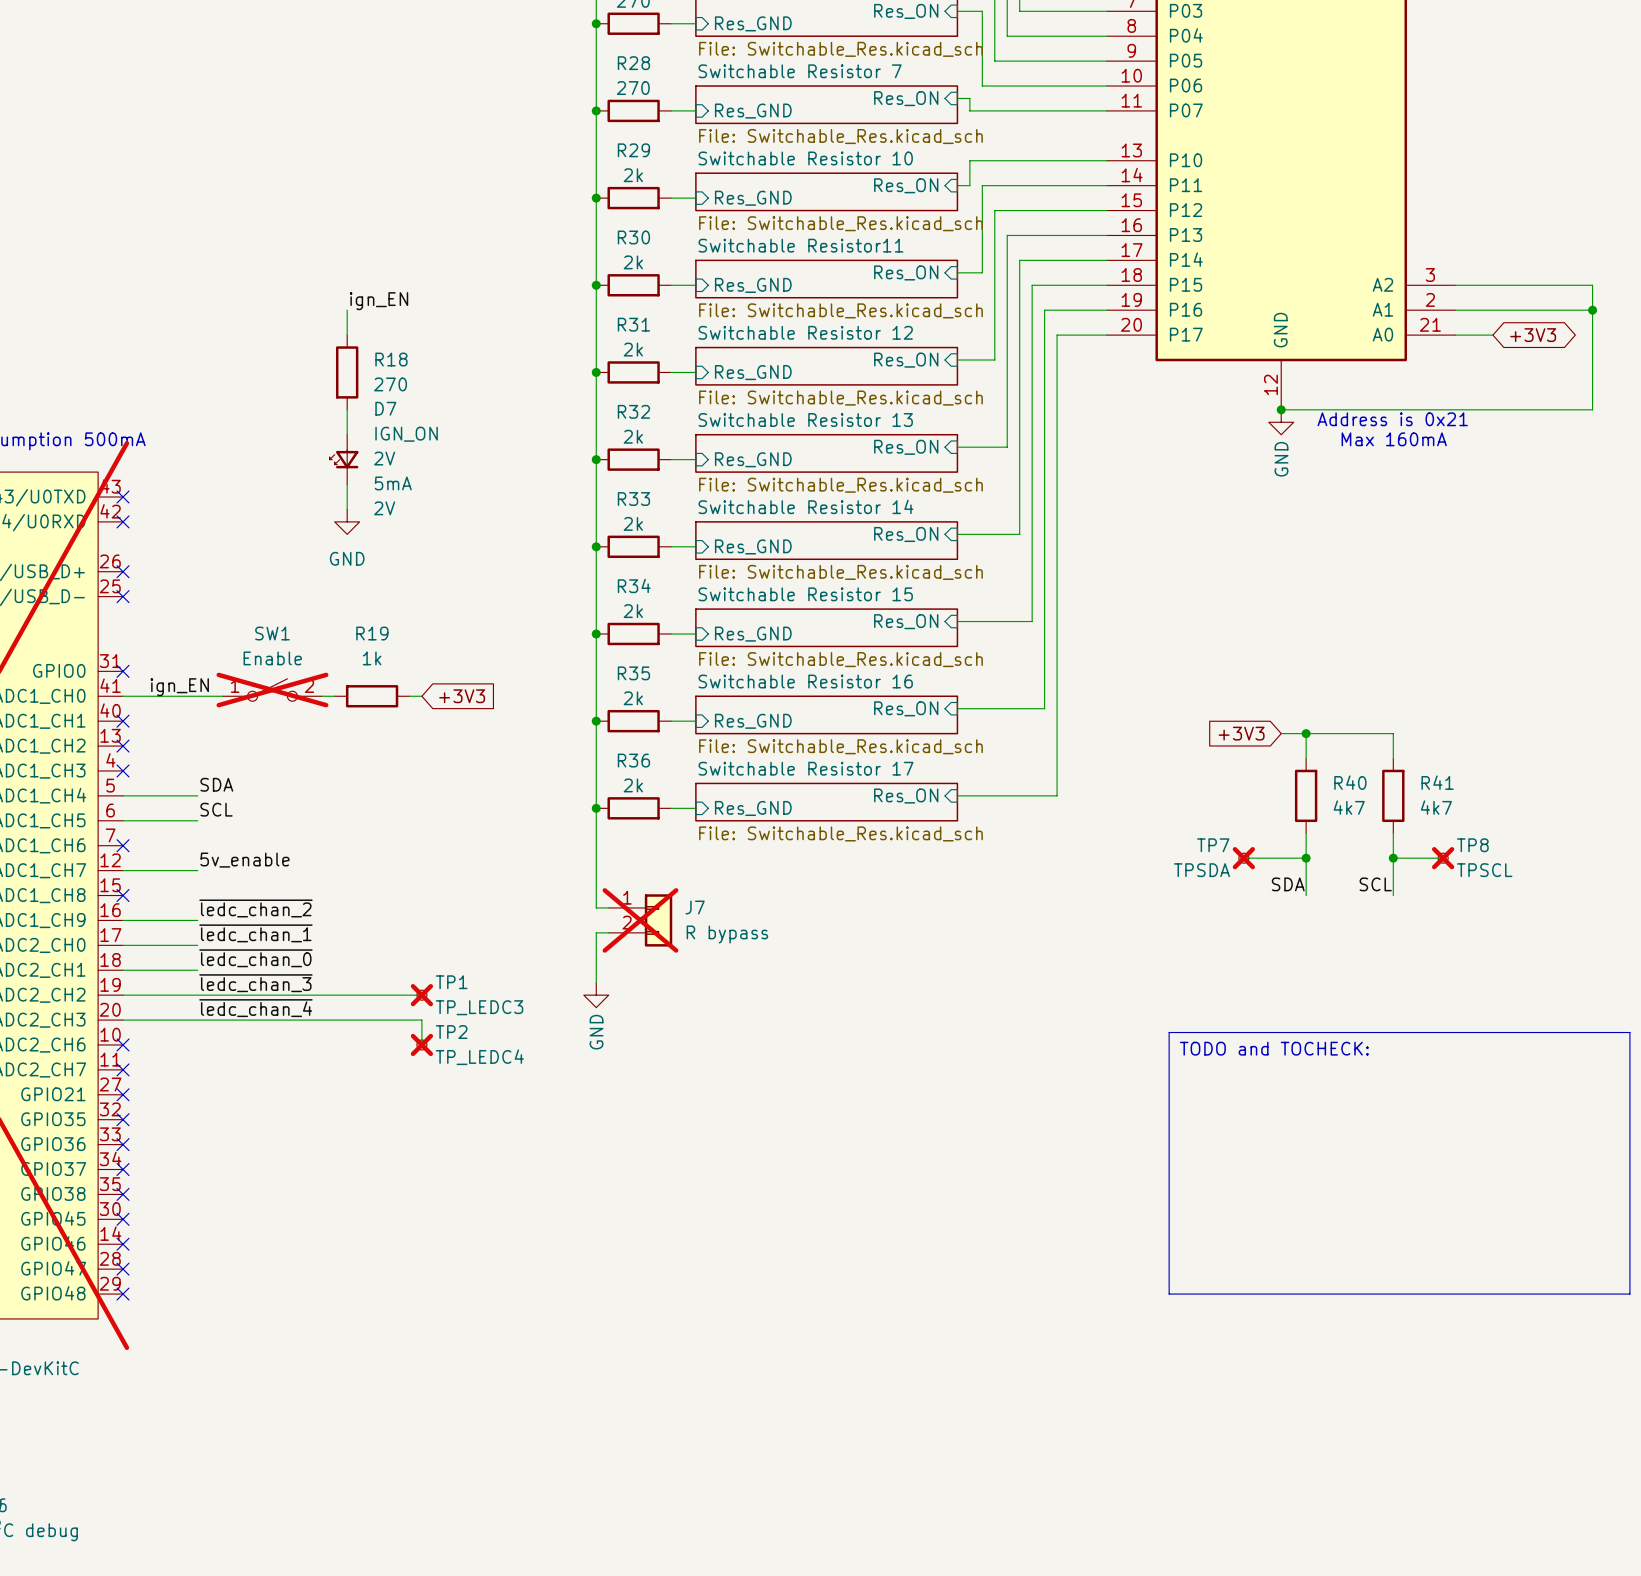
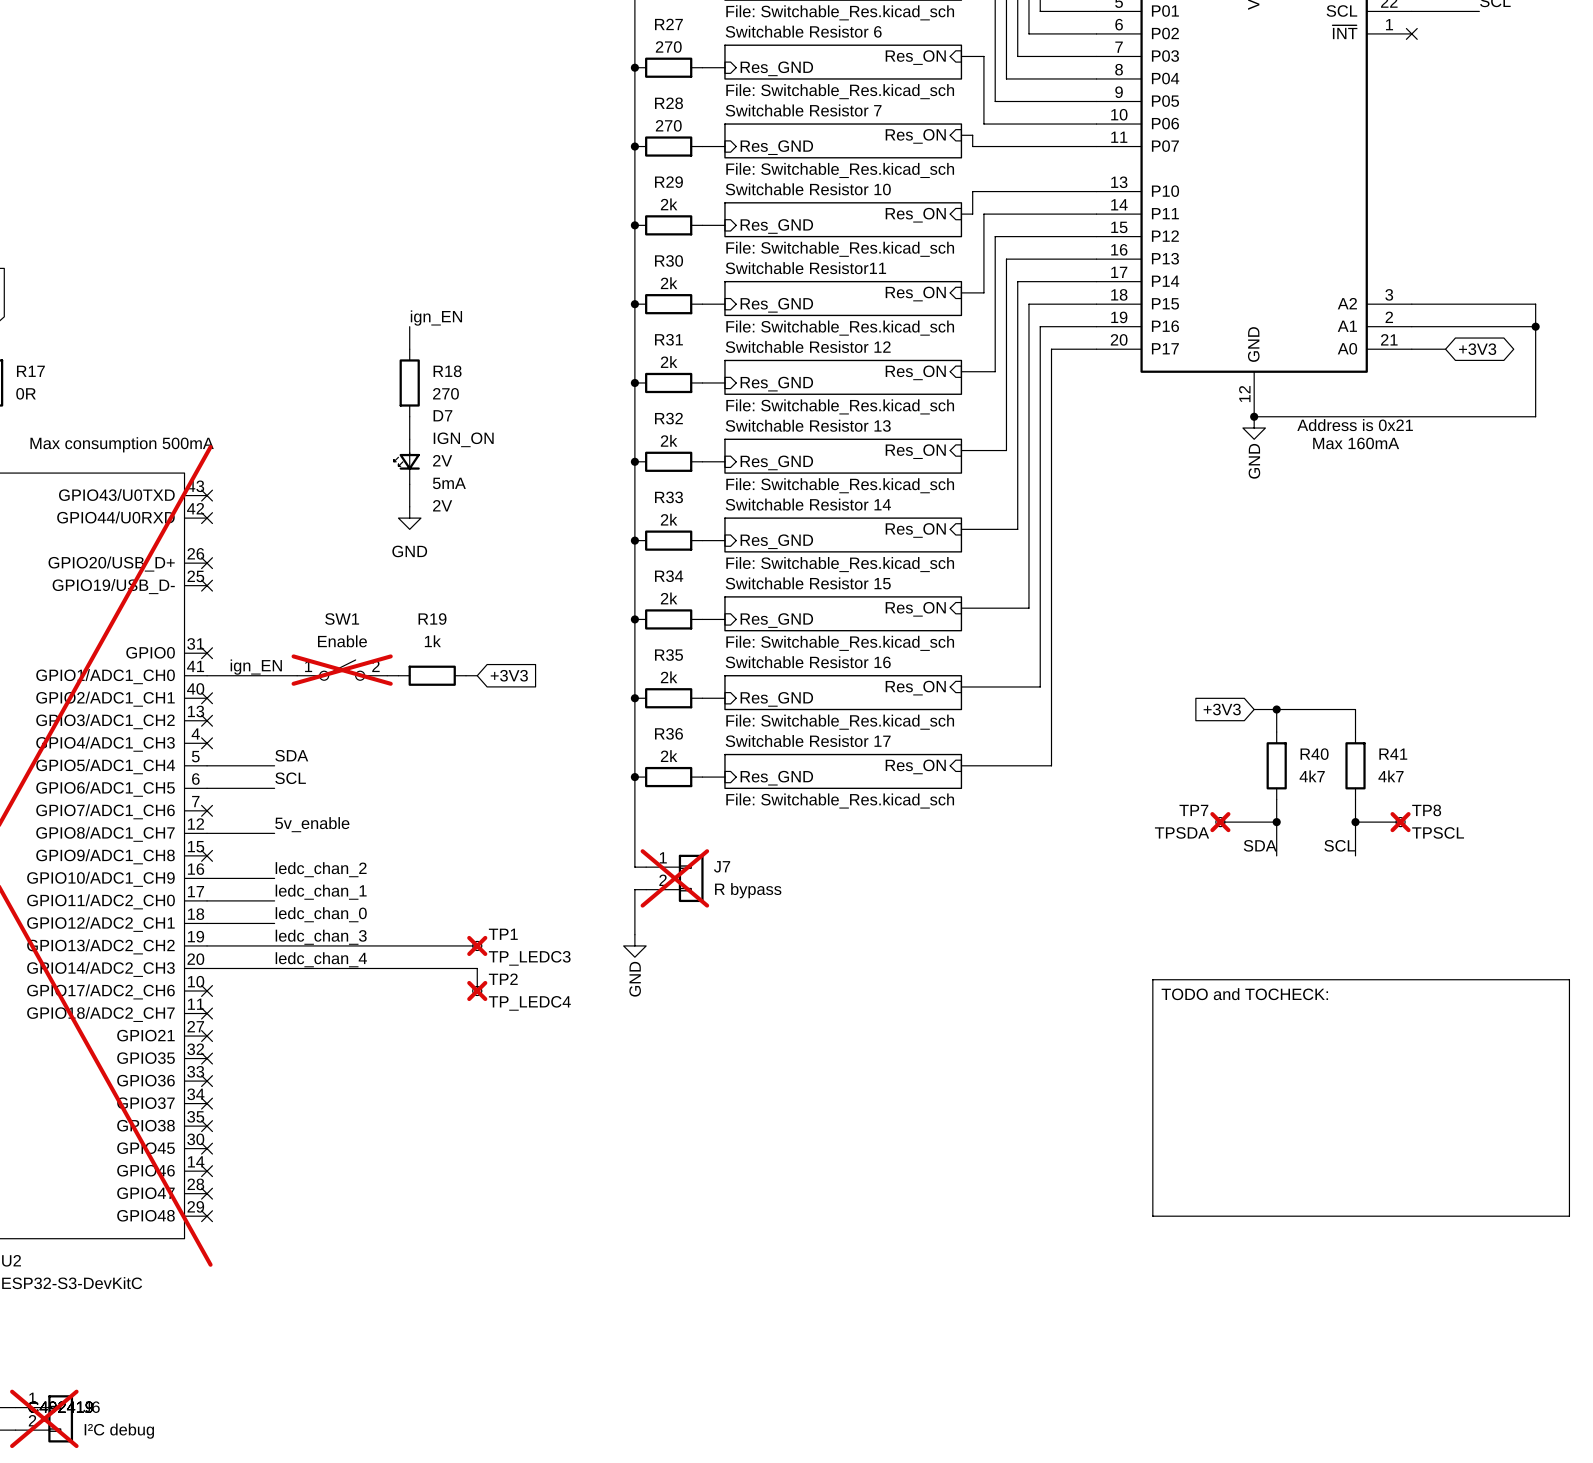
label: ~{ledc_chan_2} (255, 908) -> ledc_chan_2 (321, 869)
label: ~{ledc_chan_1} (255, 933) -> ledc_chan_1 (321, 892)
label: ~{ledc_chan_0} (255, 958) -> ledc_chan_0 (321, 914)
label: ~{ledc_chan_3} (255, 983) -> ledc_chan_3 (321, 937)
label: ~{ledc_chan_4} (255, 1008) -> ledc_chan_4 (321, 959)

